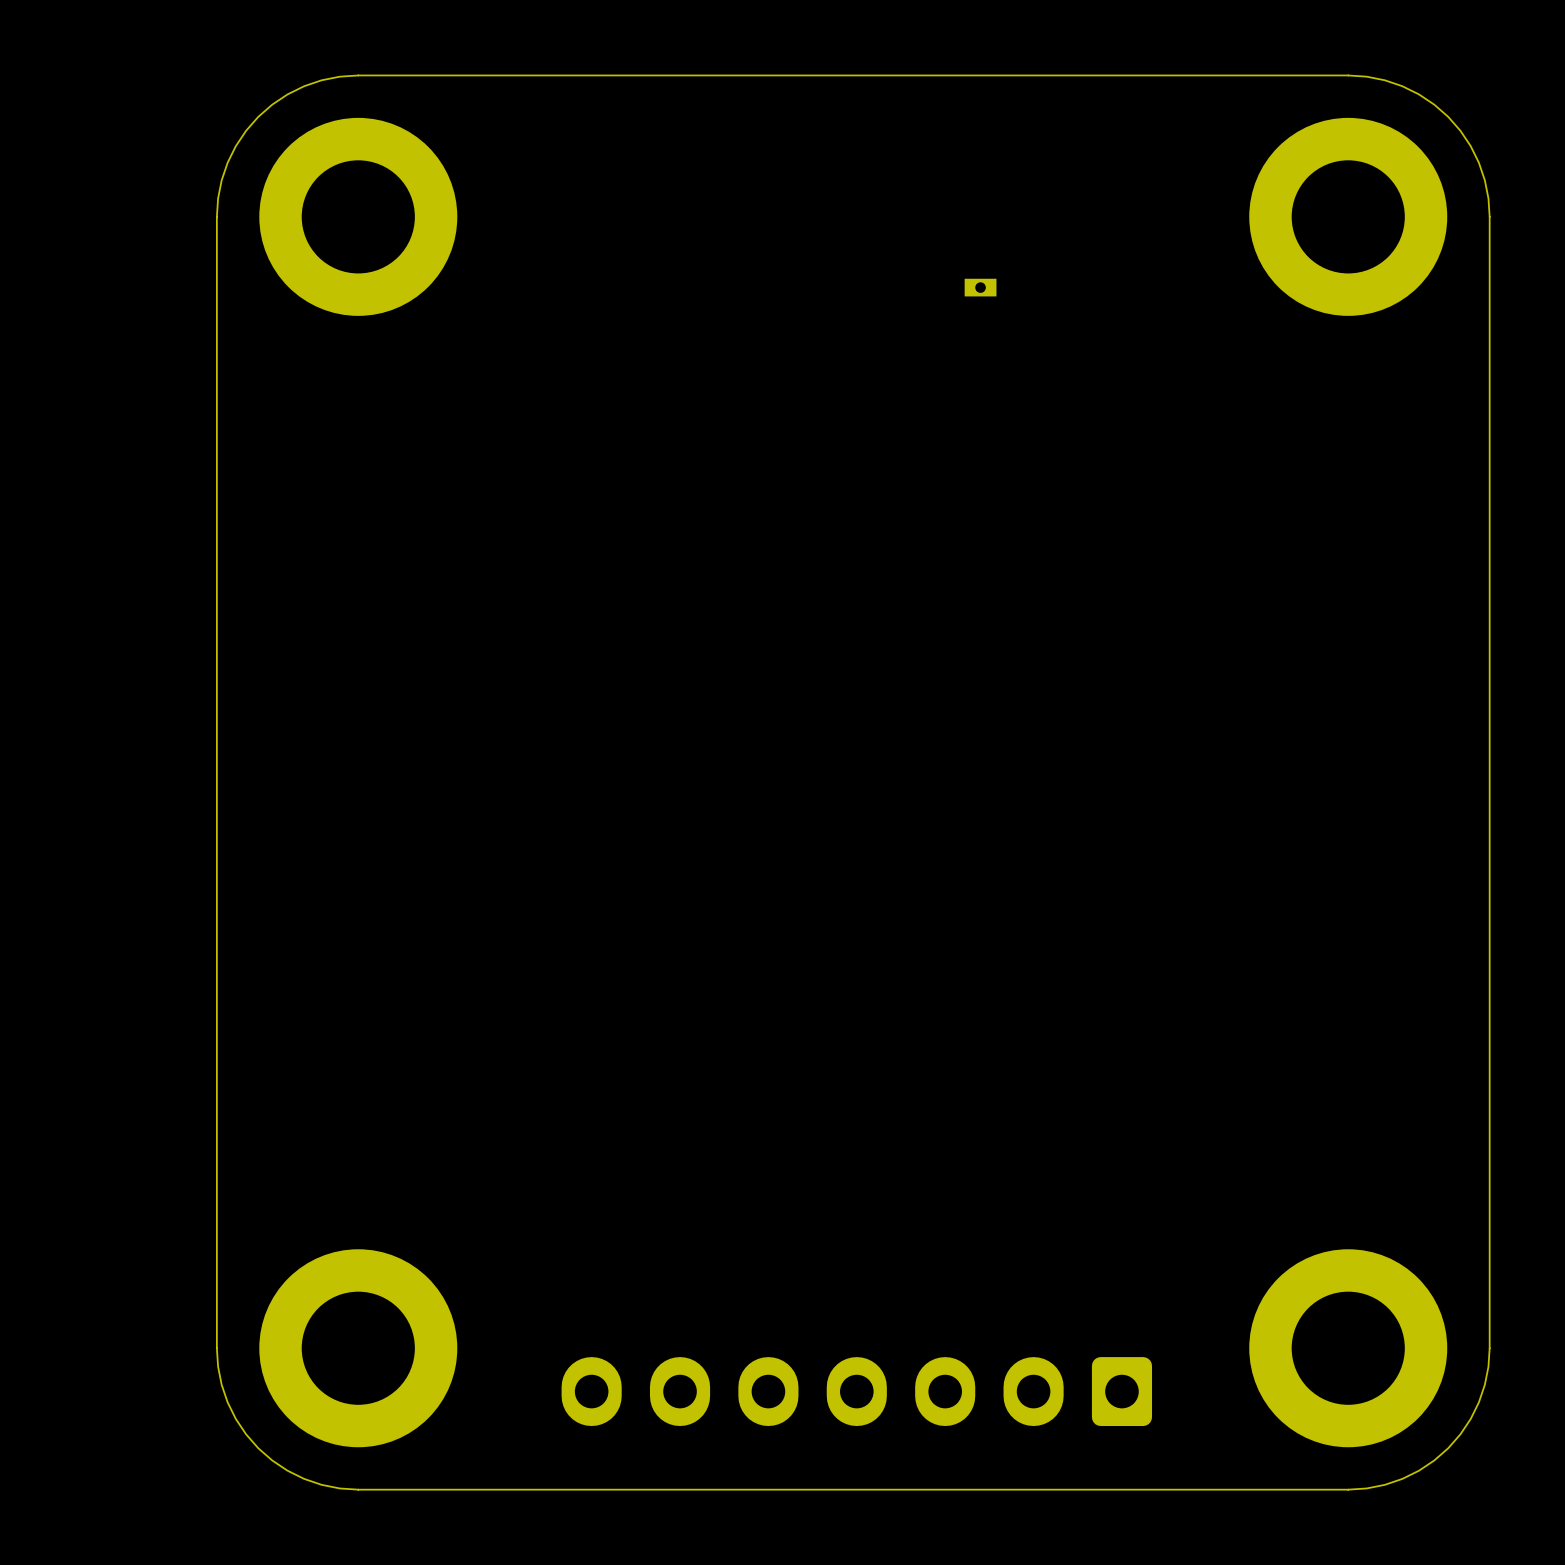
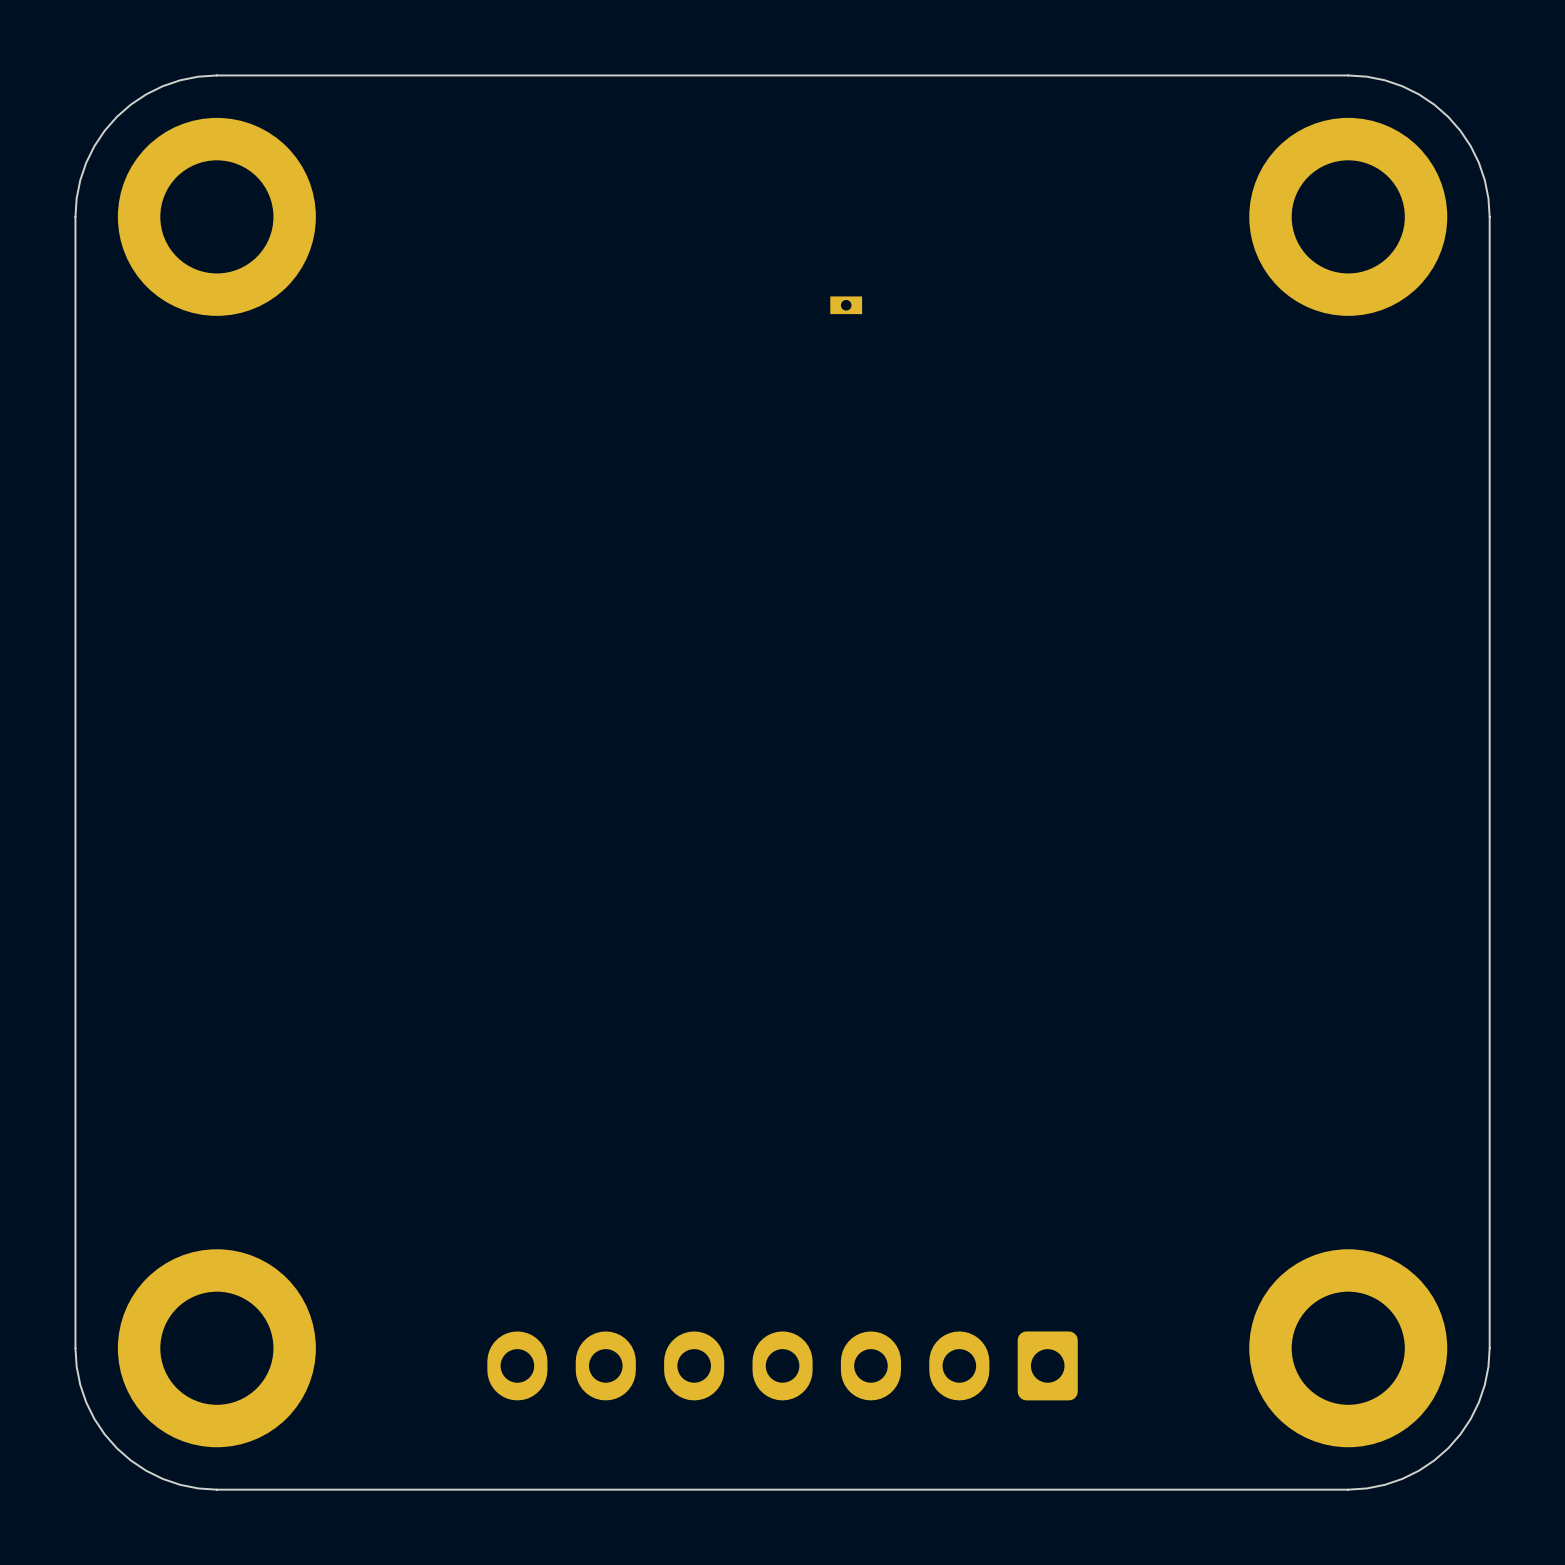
board edge: (358, 75) (321, 80) (304, 86) (287, 94) (258, 116) (246, 130) (227, 162) (221, 180) (216, 216) (218, 1366) (227, 1402) (235, 1418) (258, 1448) (287, 1470) (304, 1478) (321, 1484) (358, 1489) -> (358, 75) (198, 76) (180, 80) (146, 94) (116, 116) (94, 146) (80, 180) (75, 216) (75, 1348) (80, 1384) (86, 1402) (104, 1434) (130, 1460) (162, 1478) (198, 1488) (216, 1489) (358, 1489)
part position: (358, 216) -> (216, 216)
part position: (980, 287) -> (846, 305)
part position: (358, 1348) -> (216, 1348)
part position: (856, 1391) -> (782, 1365)

